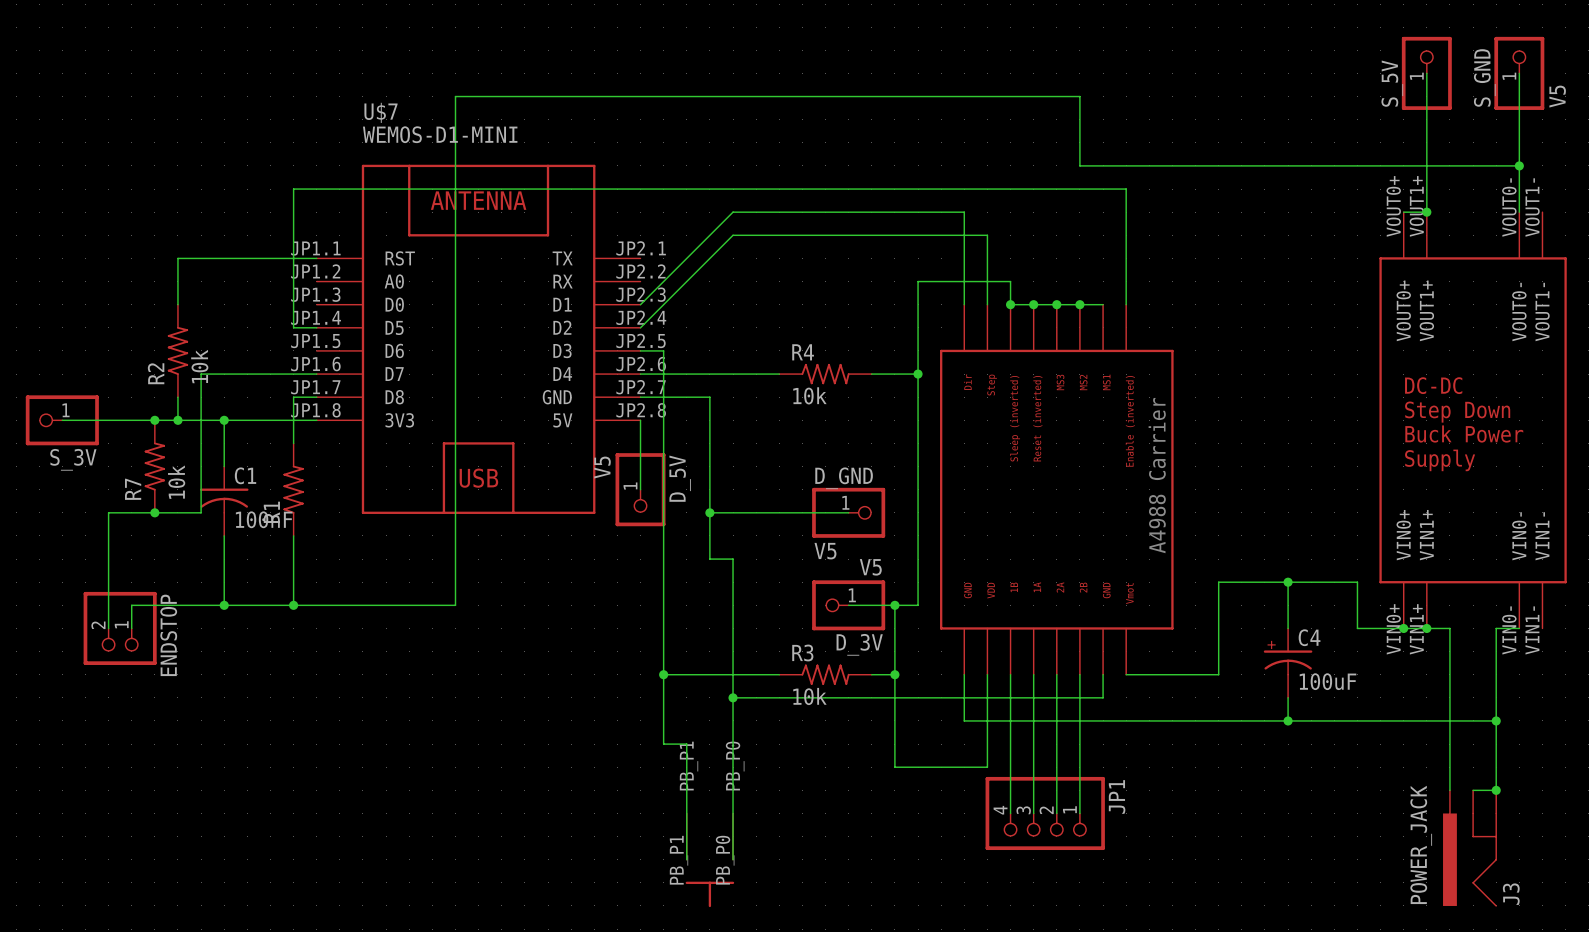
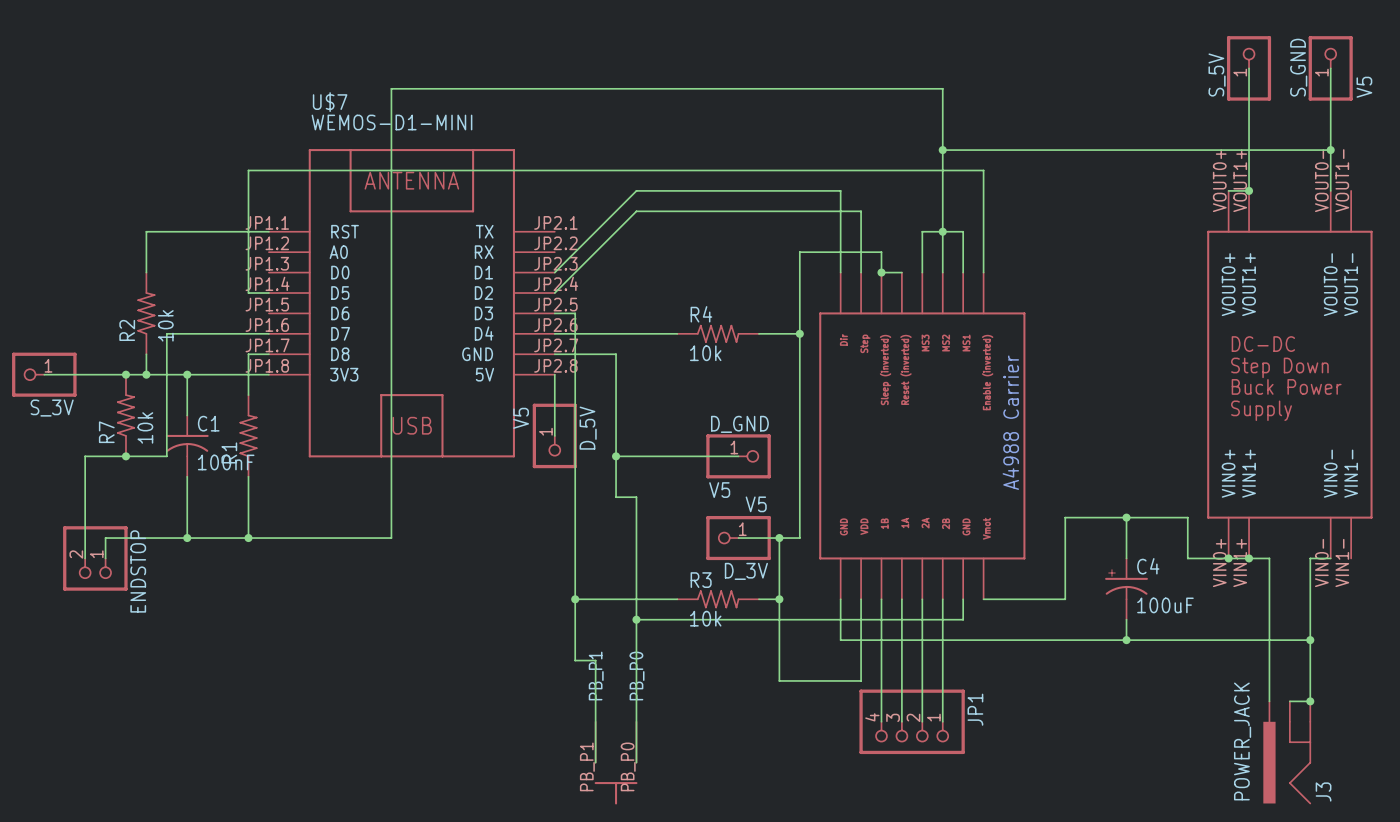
wire: none -> (942, 150) (942, 272)
junction: none -> (942, 150)
junction: none -> (942, 231)
wire: (1033, 304) (1103, 304) -> (922, 272) (922, 231) (963, 231) (963, 272)
junction: (1033, 304) -> none
junction: (1056, 304) -> none
junction: (1079, 304) -> none

